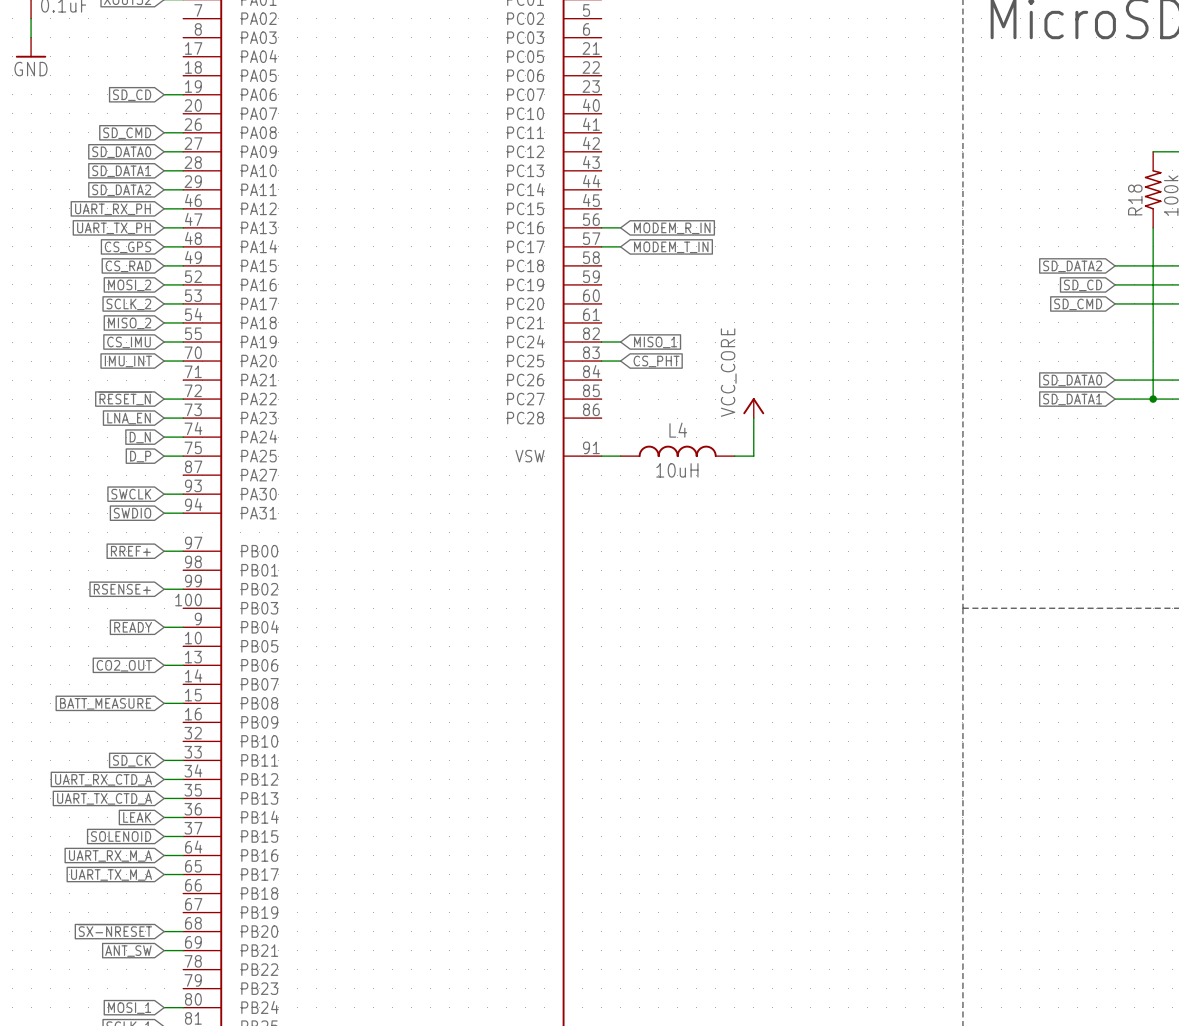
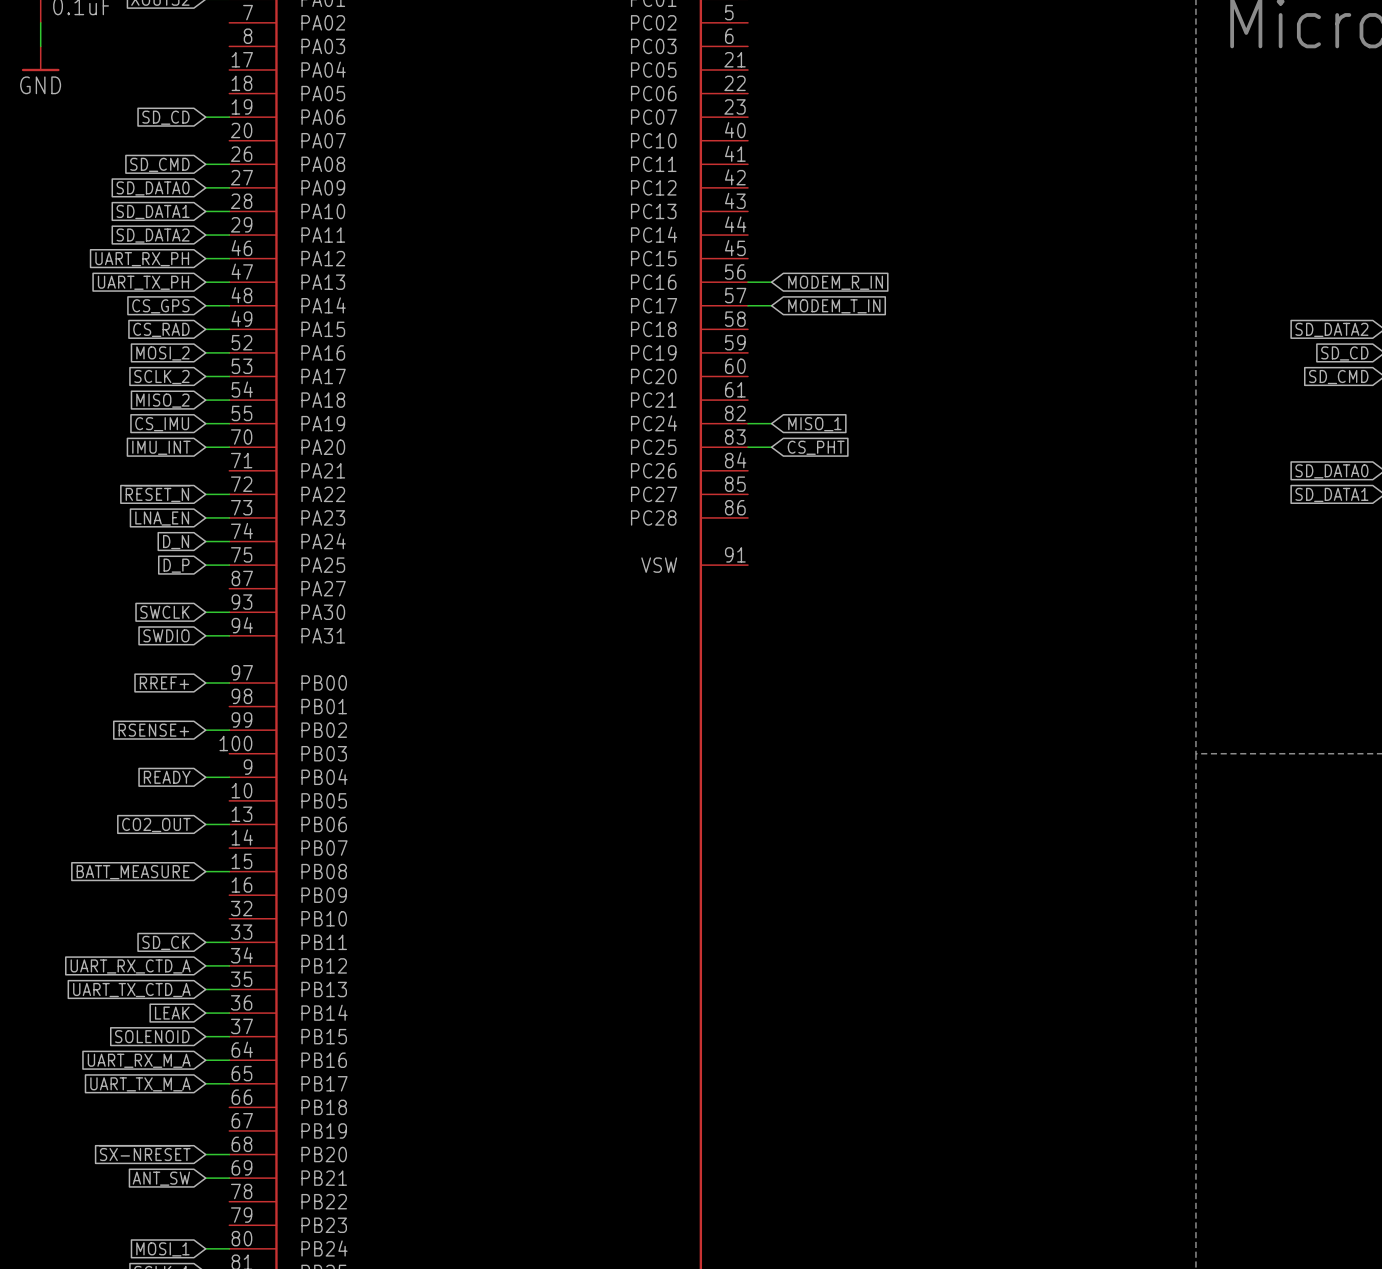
power symbol: VCC_CORE (753, 408) -> none
wire: (753, 418) (753, 456) (734, 456) -> none
L4: 10uH (677, 451) -> none
wire: (601, 456) (620, 456) -> none

